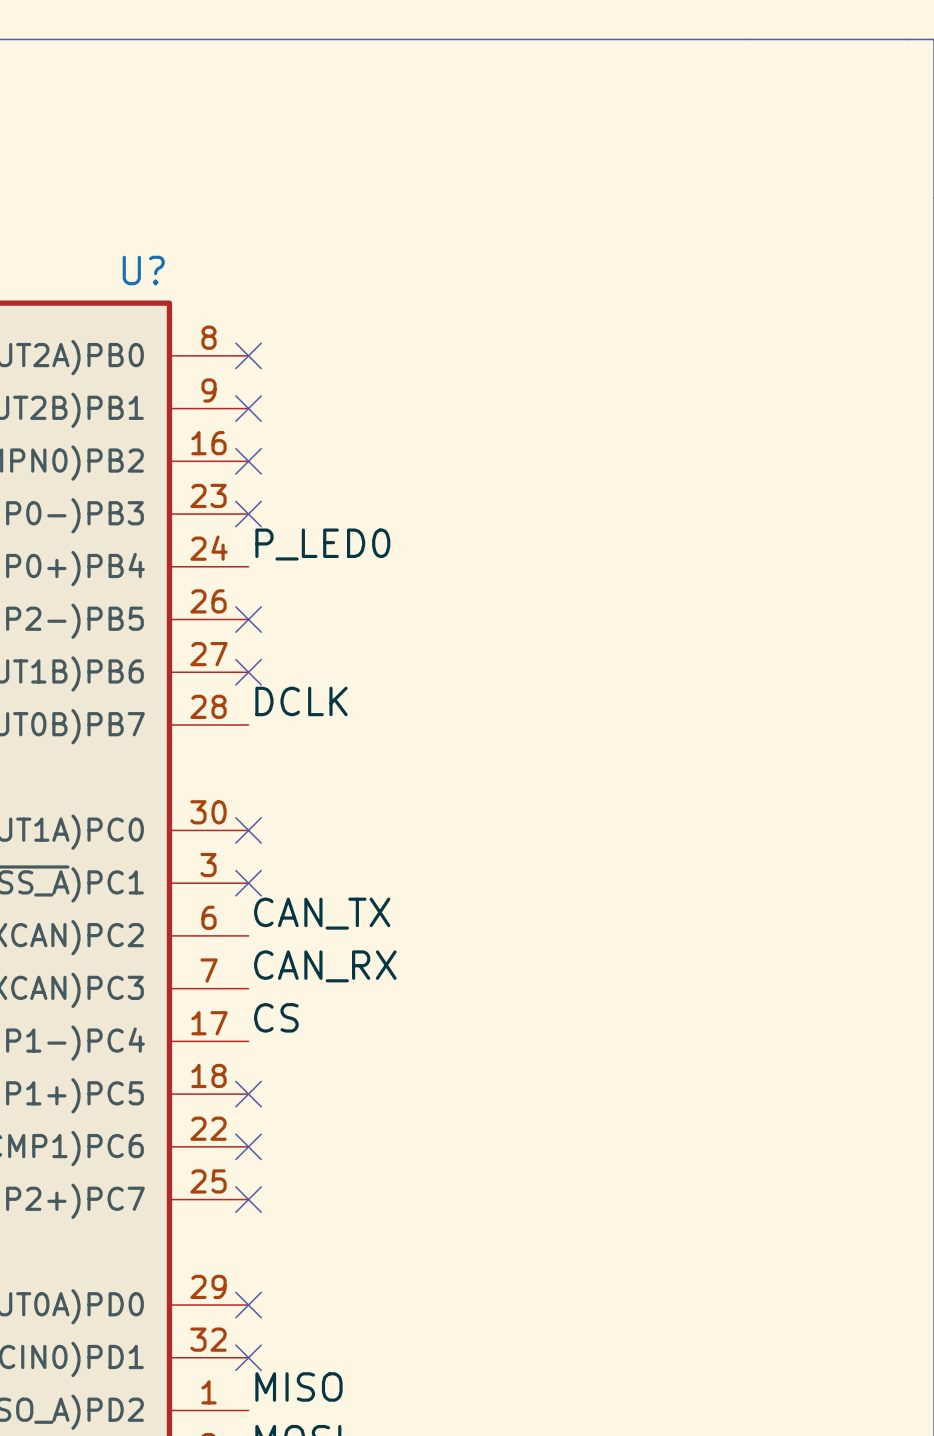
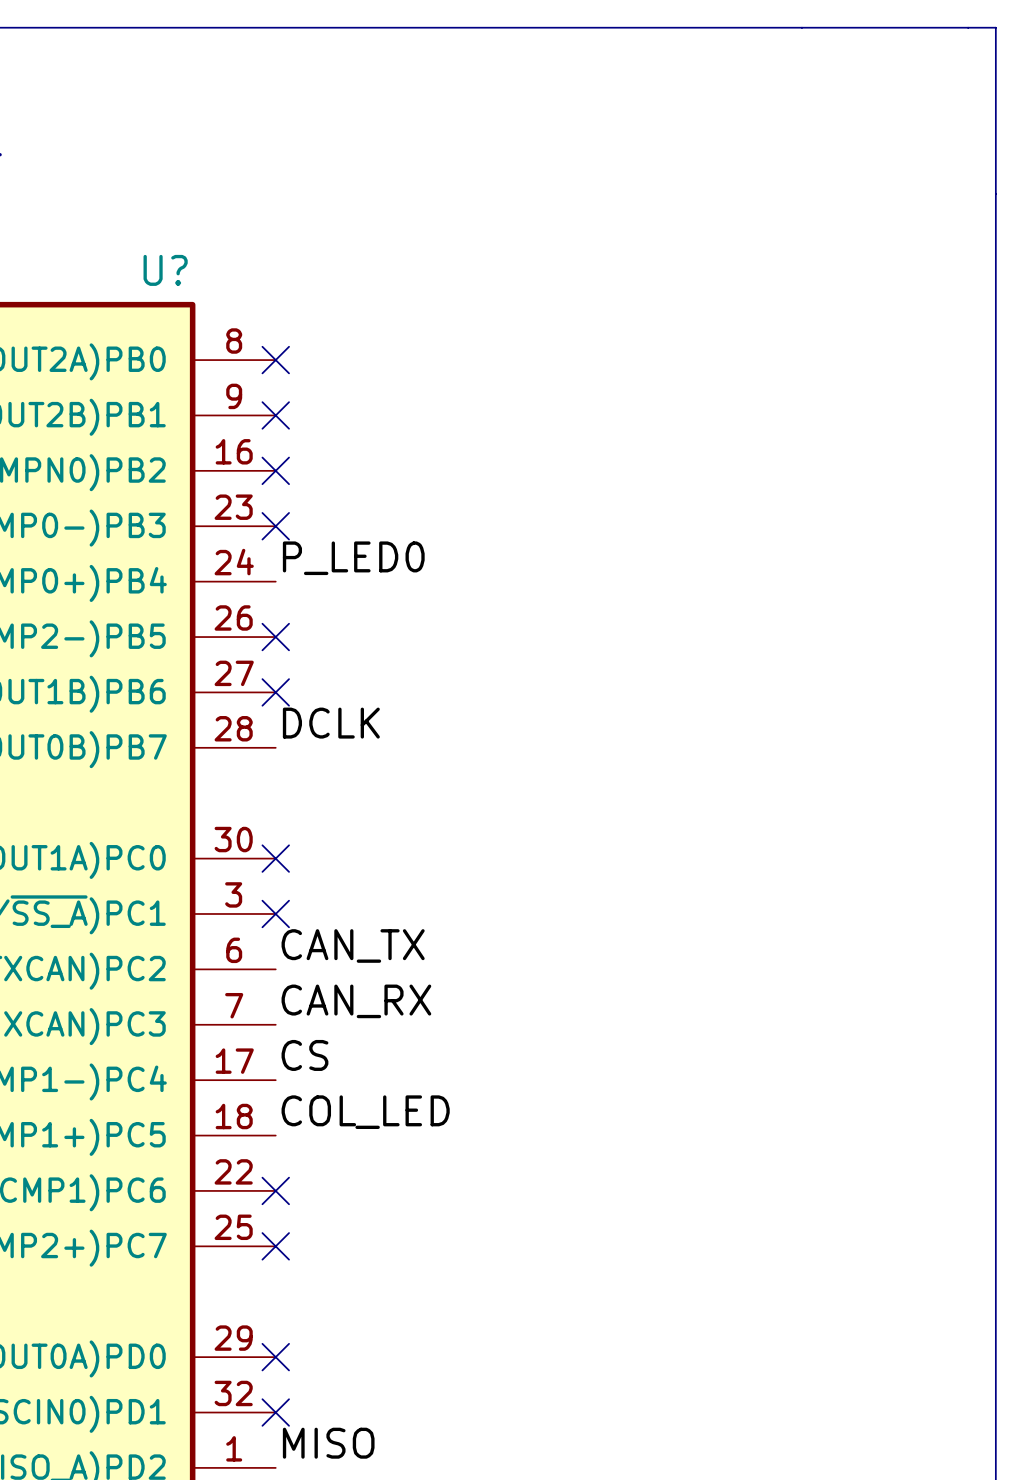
label: none -> COL_LED (365, 1112)
no-connect mark: (248, 1094) -> none

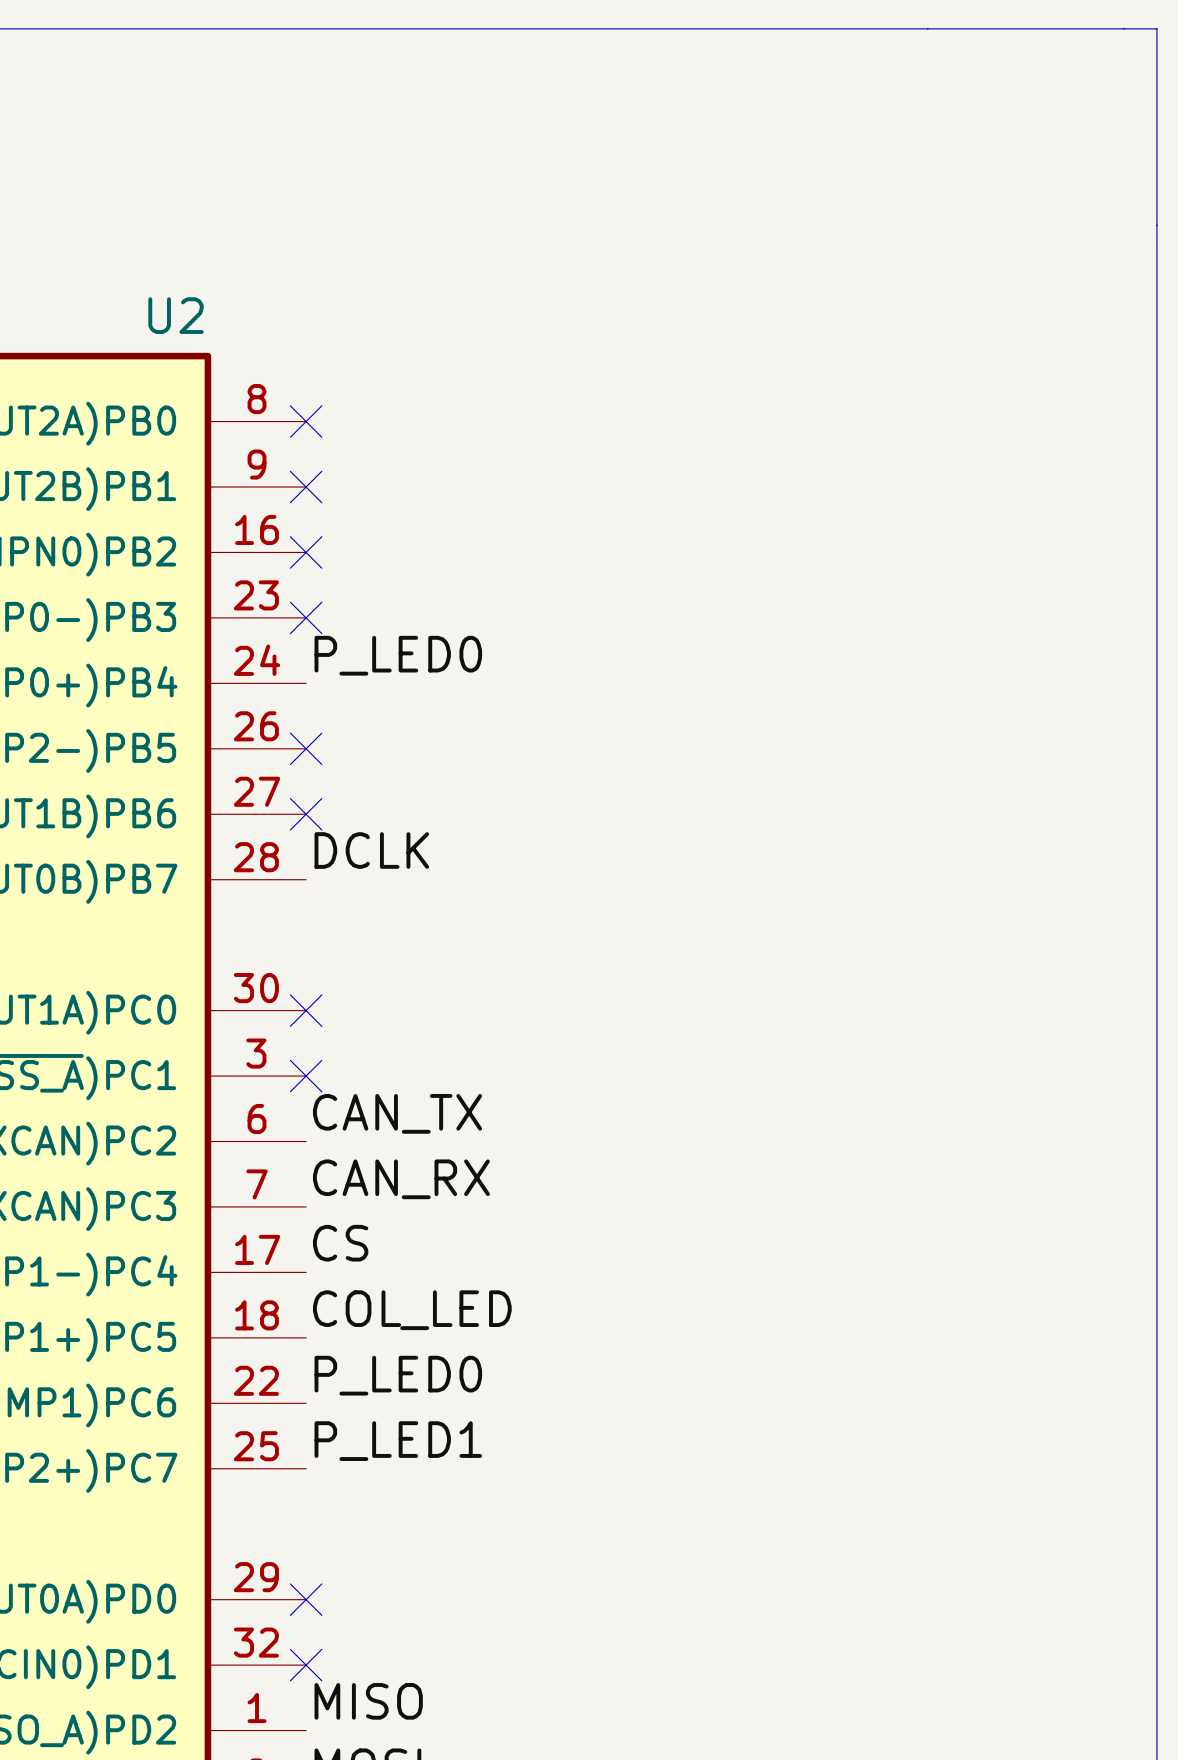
U? name: U? (165, 270) -> U2 (175, 315)
label: none -> P_LED0 (398, 1375)
no-connect mark: (275, 1190) -> none
label: none -> P_LED1 (398, 1441)
no-connect mark: (275, 1246) -> none

